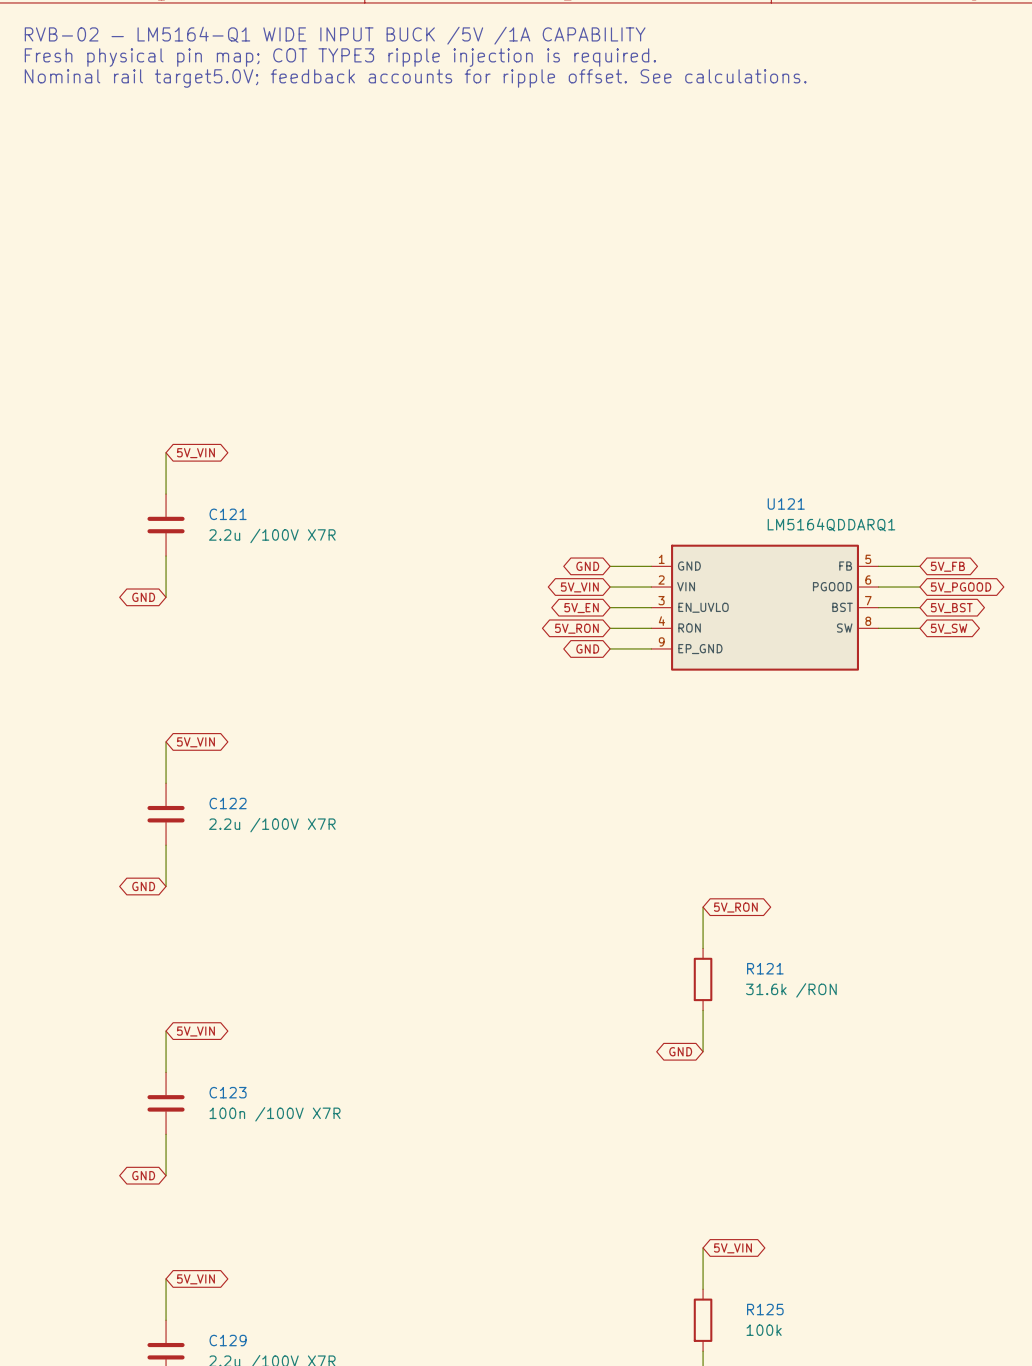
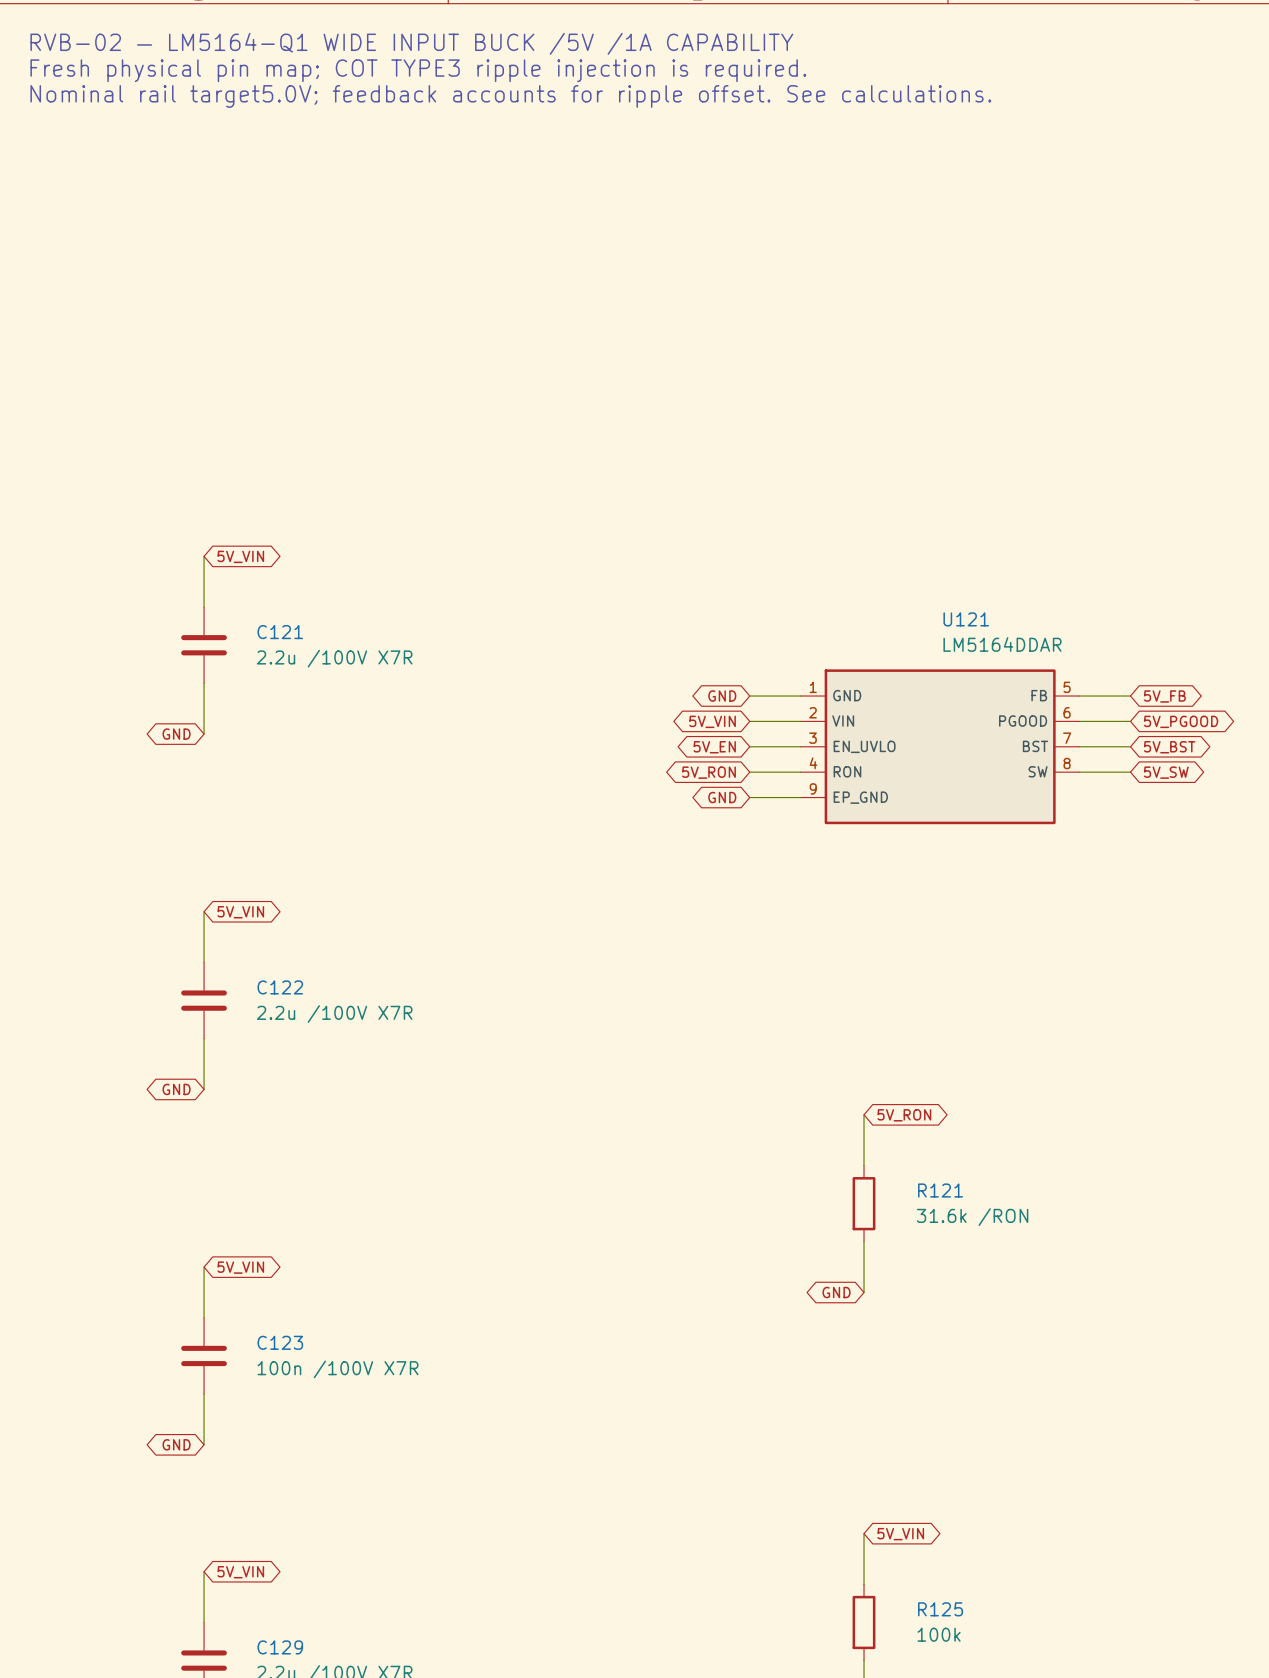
U121 value: LM5164QDDARQ1 (831, 524) -> LM5164DDAR (1002, 644)

